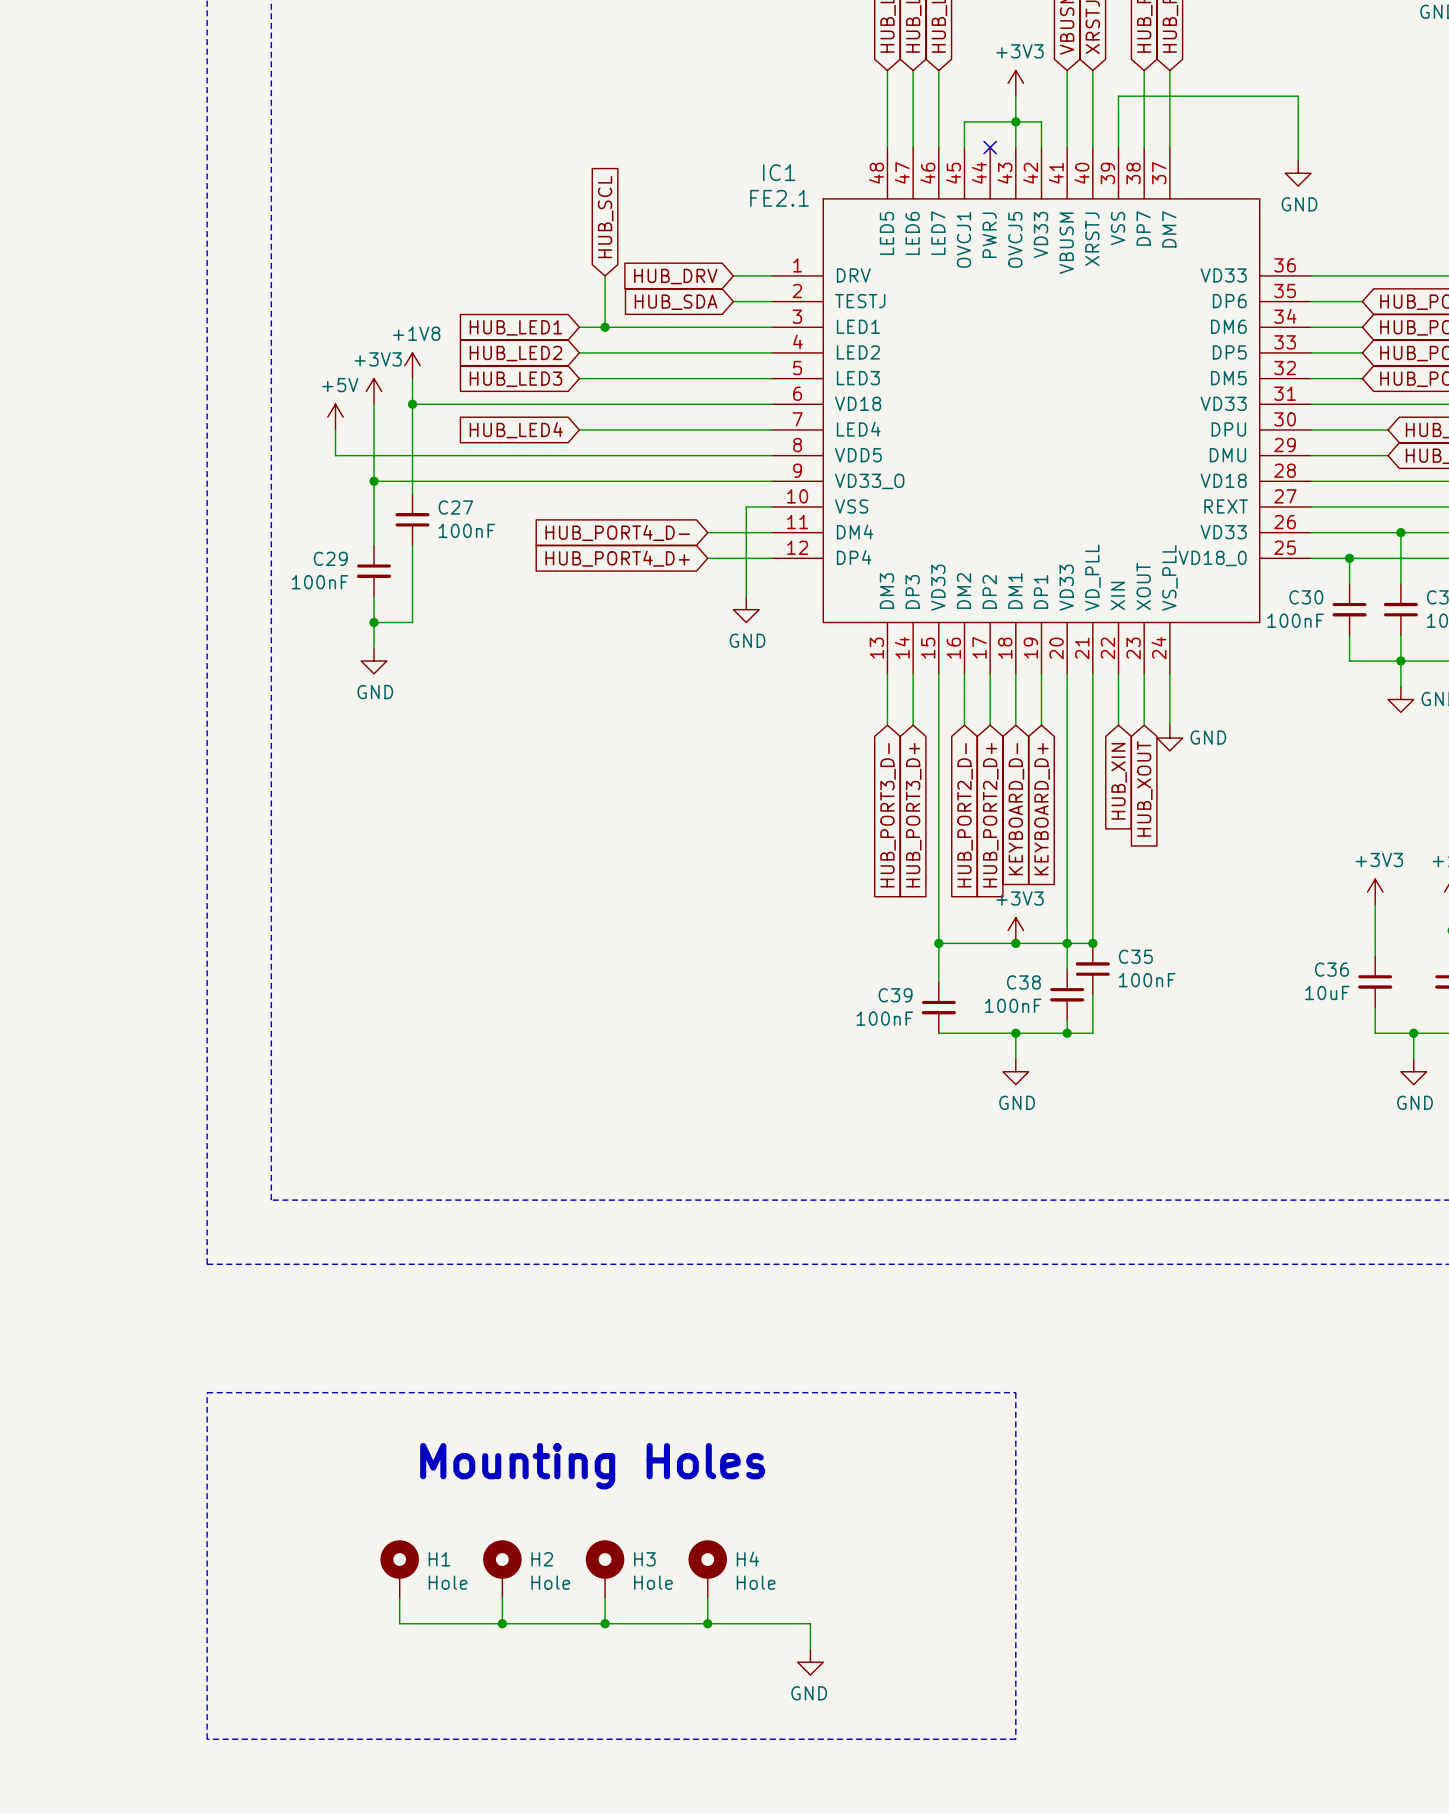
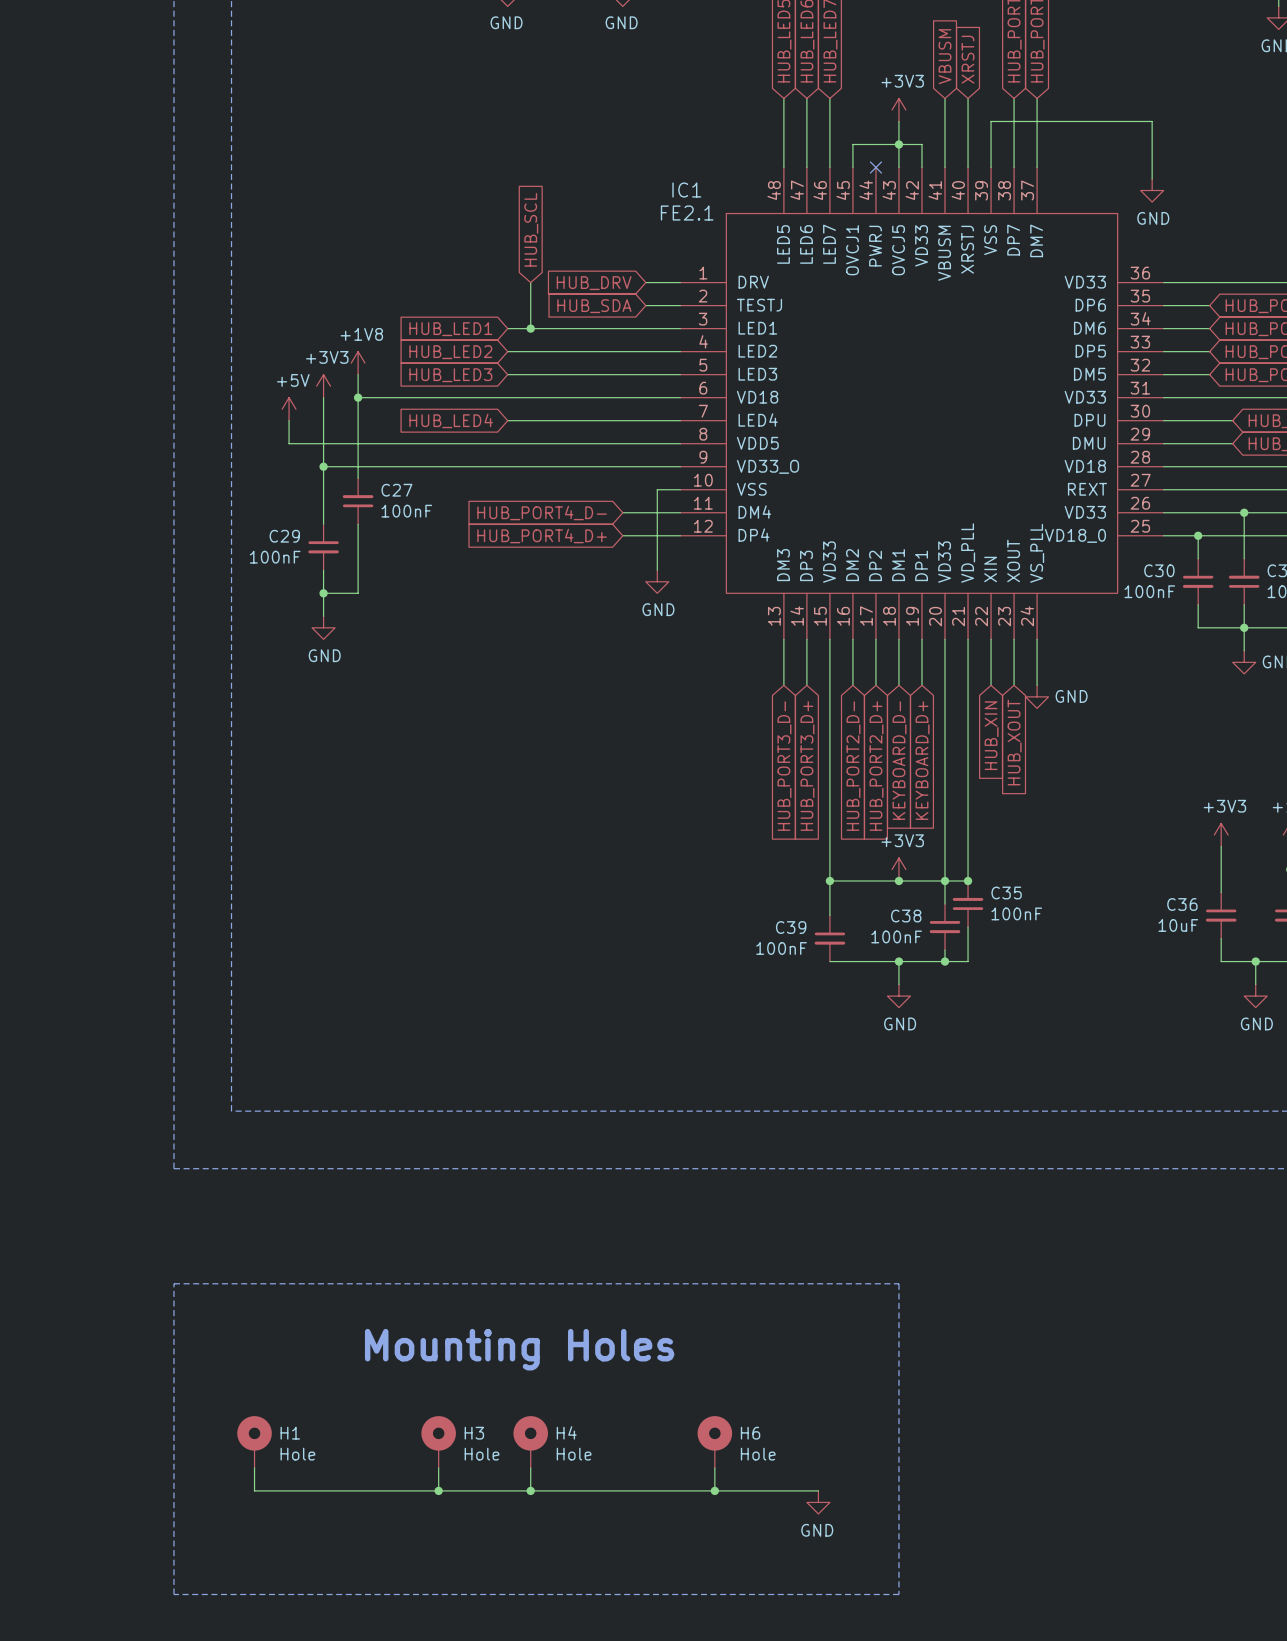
H2 name: H2 (542, 1559) -> H3 (474, 1433)
H3 name: H3 (644, 1559) -> H4 (566, 1432)
H1 position: (399, 1569) -> (254, 1442)
H4: Hole (707, 1569) -> none
H6: none -> Hole (714, 1442)
wire: (399, 1598) (399, 1623) -> (254, 1467) (254, 1490) (346, 1490)
wire: (707, 1598) (707, 1623) -> none
wire: none -> (714, 1467) (714, 1490) (818, 1490)
junction: (707, 1623) -> none
wire: (810, 1623) (810, 1649) -> none
junction: none -> (714, 1490)
power symbol position: GND (810, 1662) -> GND (818, 1502)

